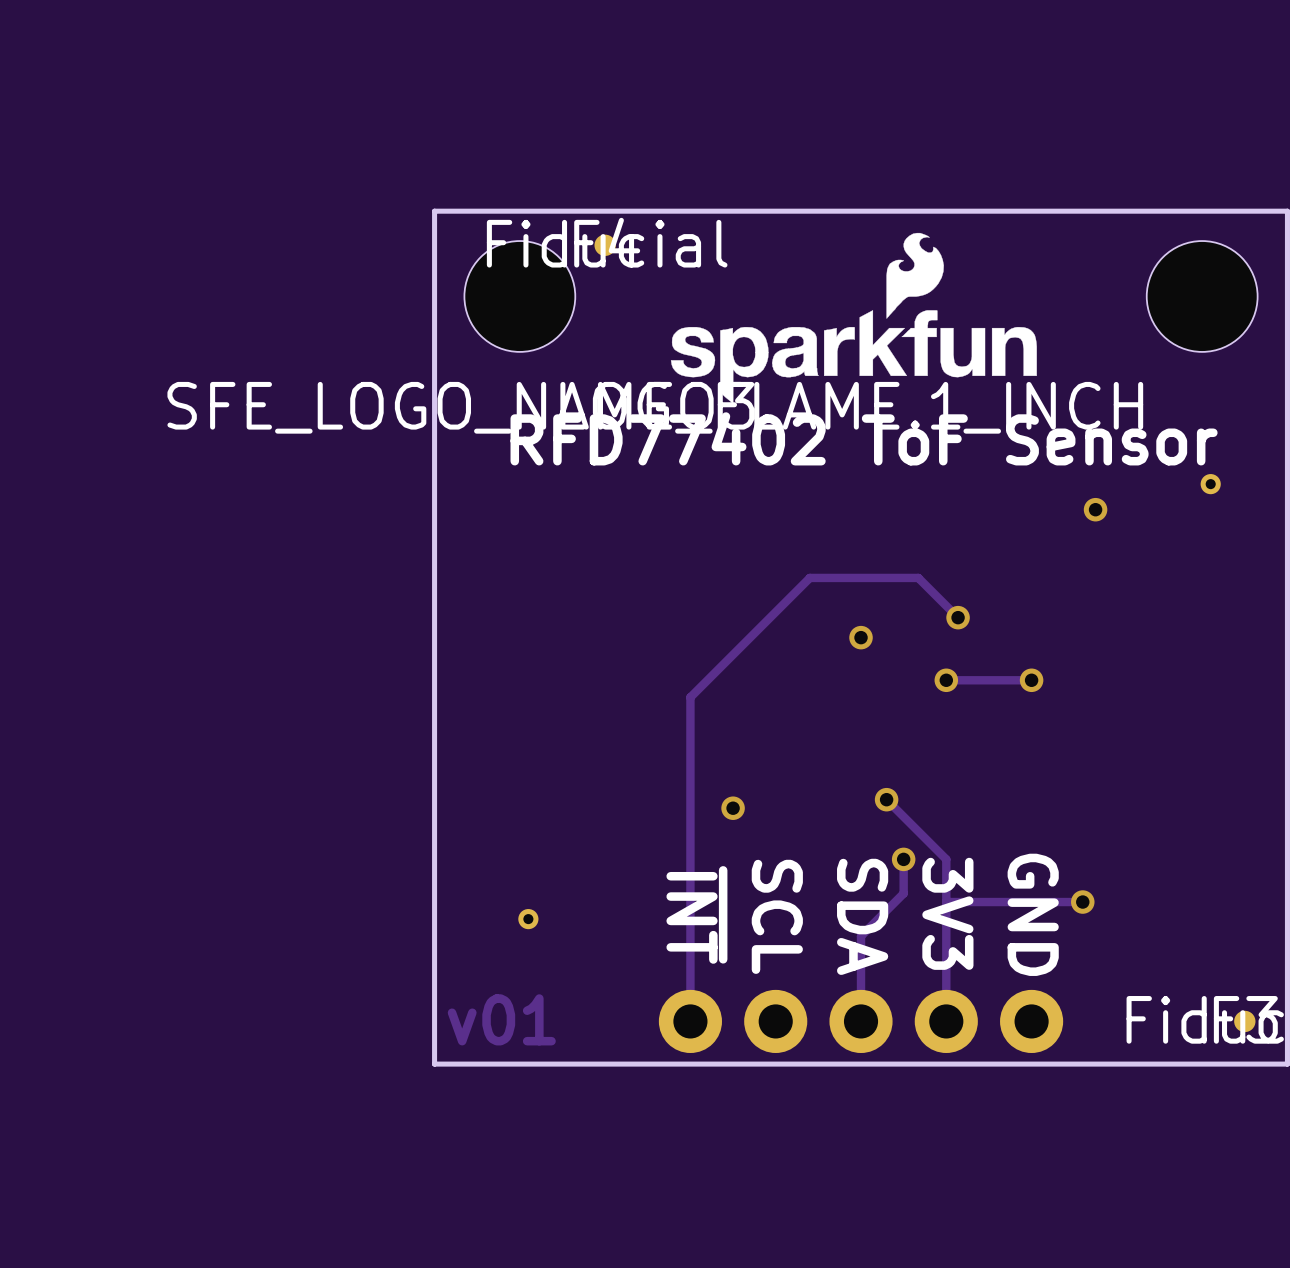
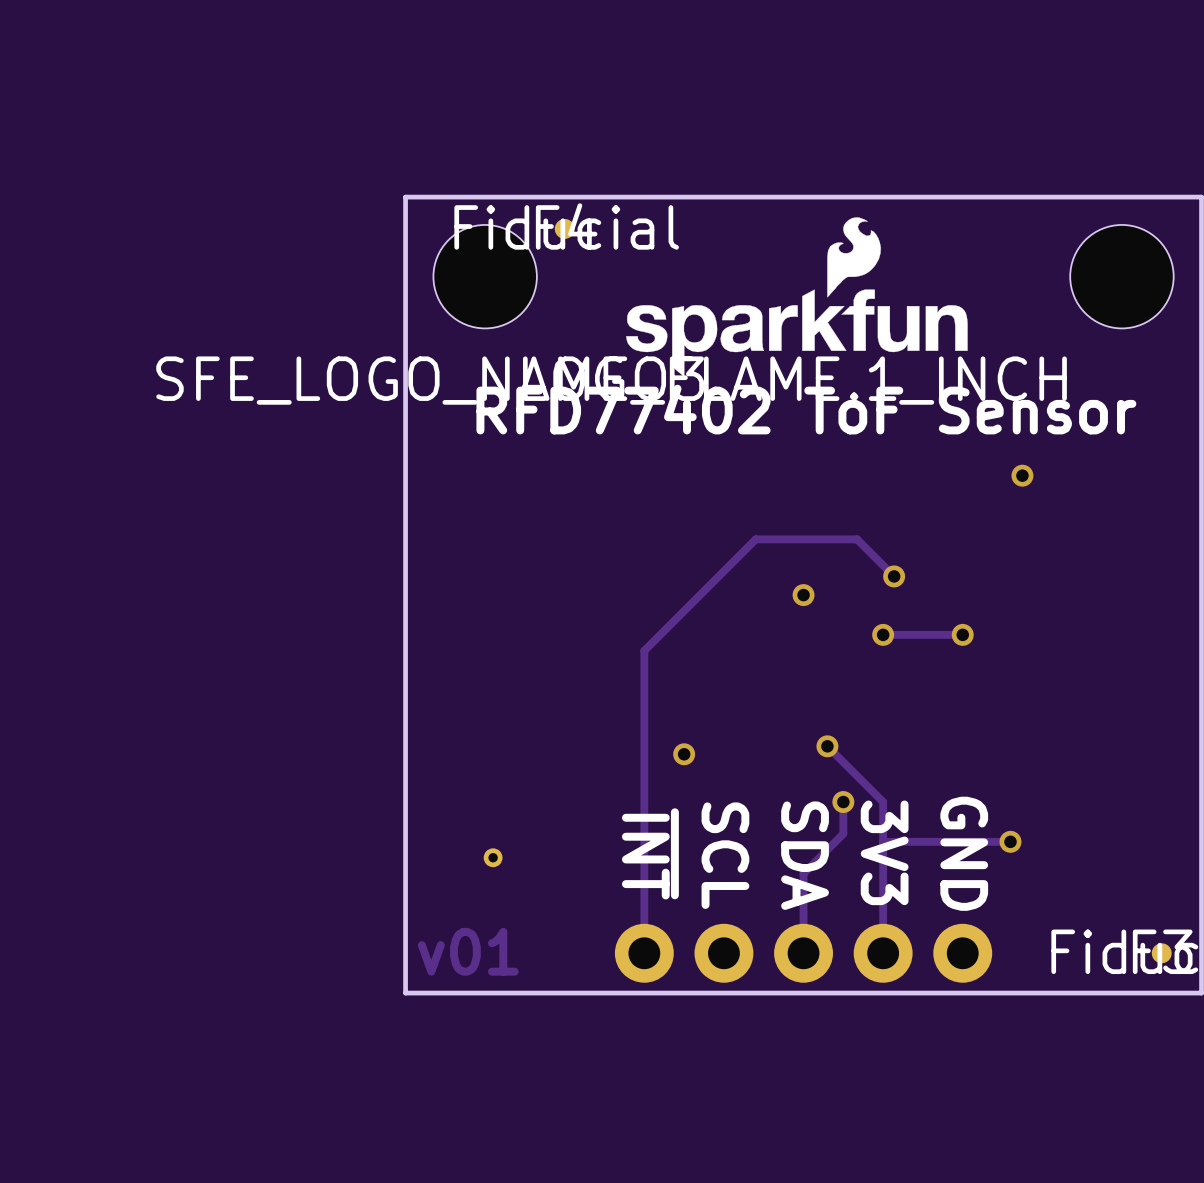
part: (1210, 484) -> none

